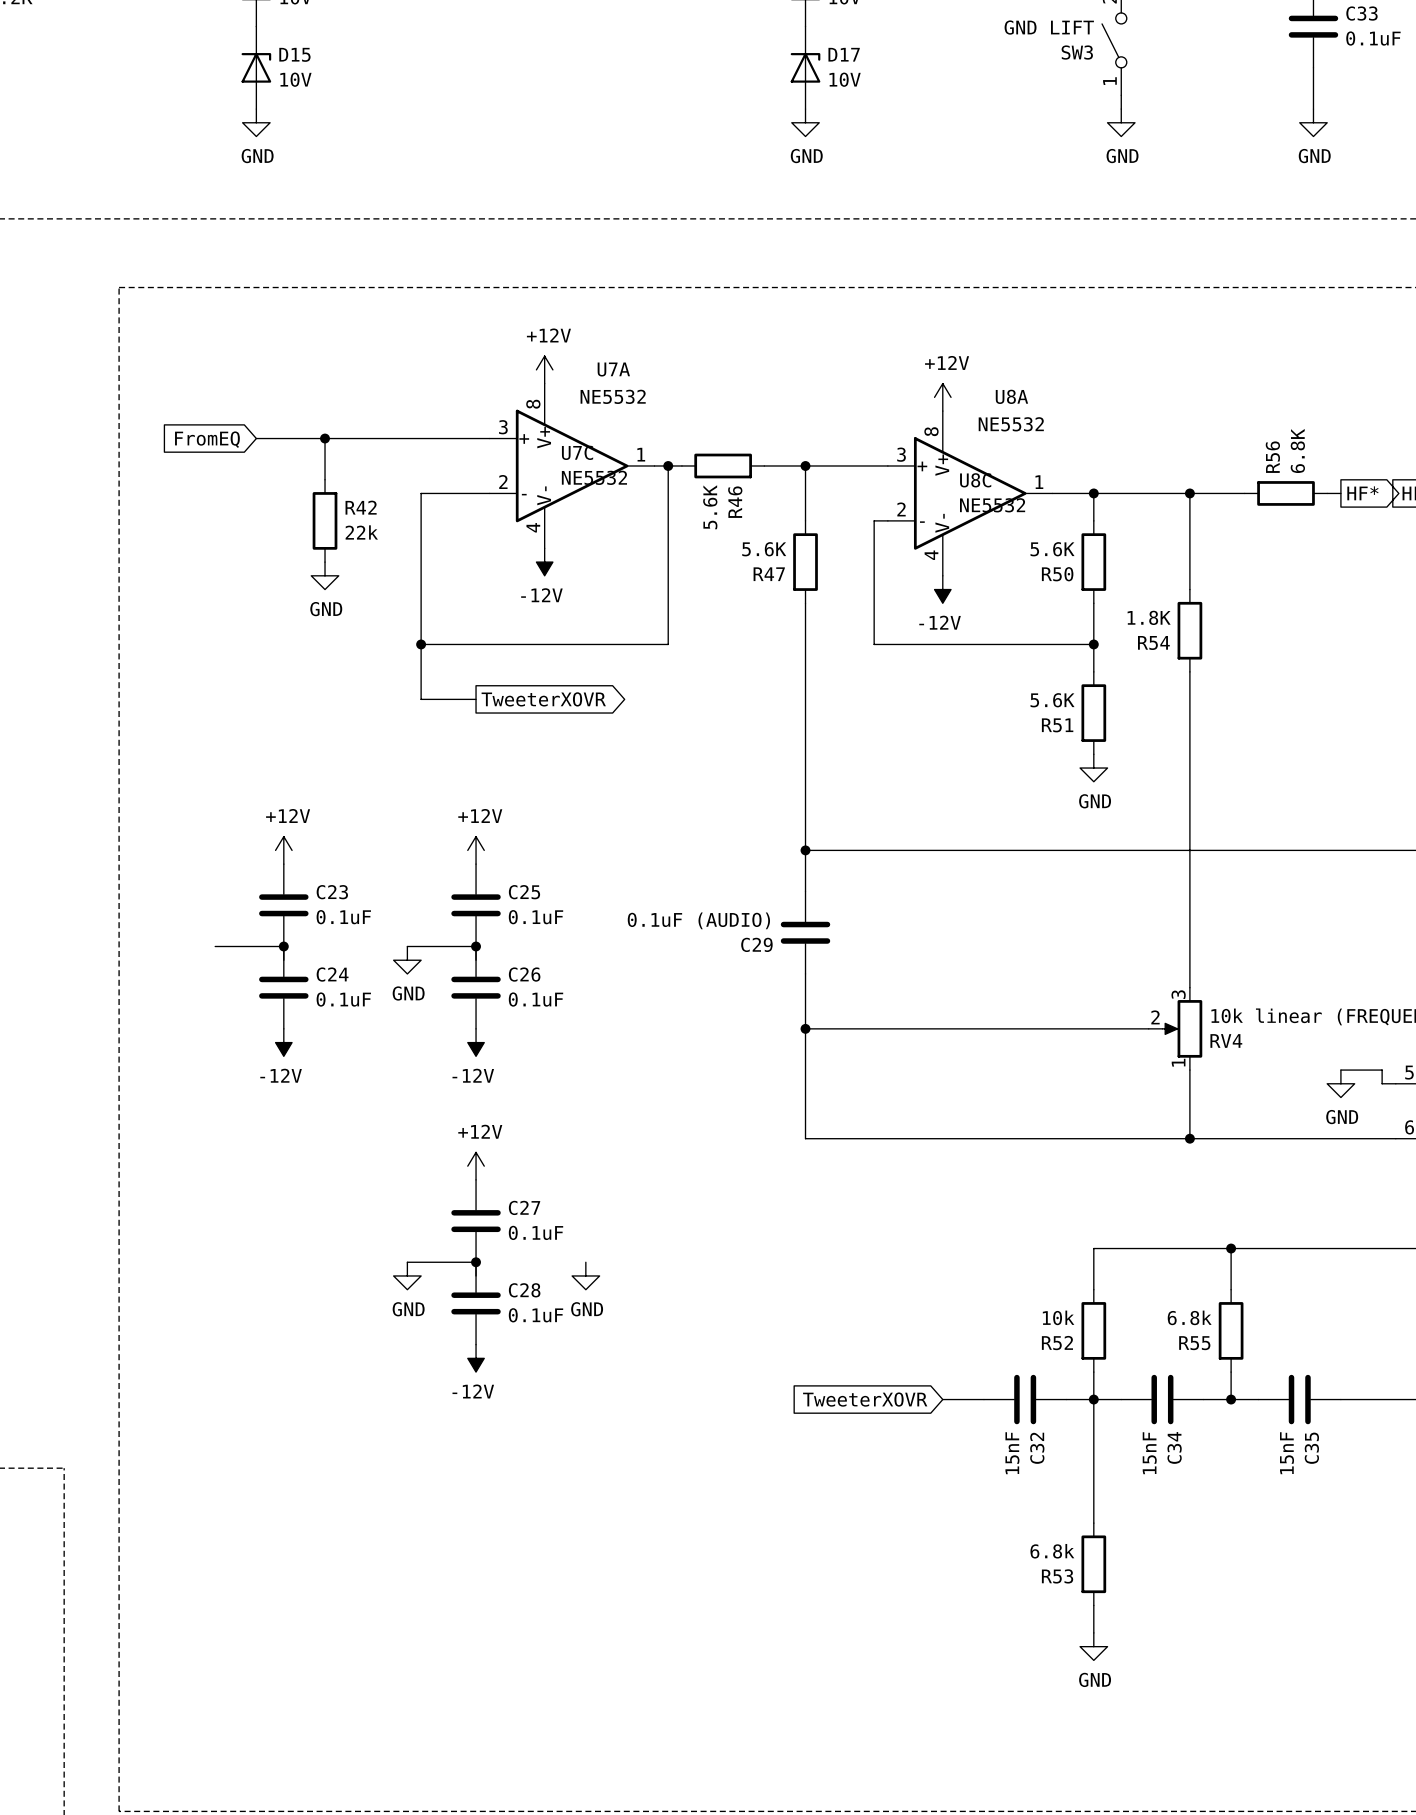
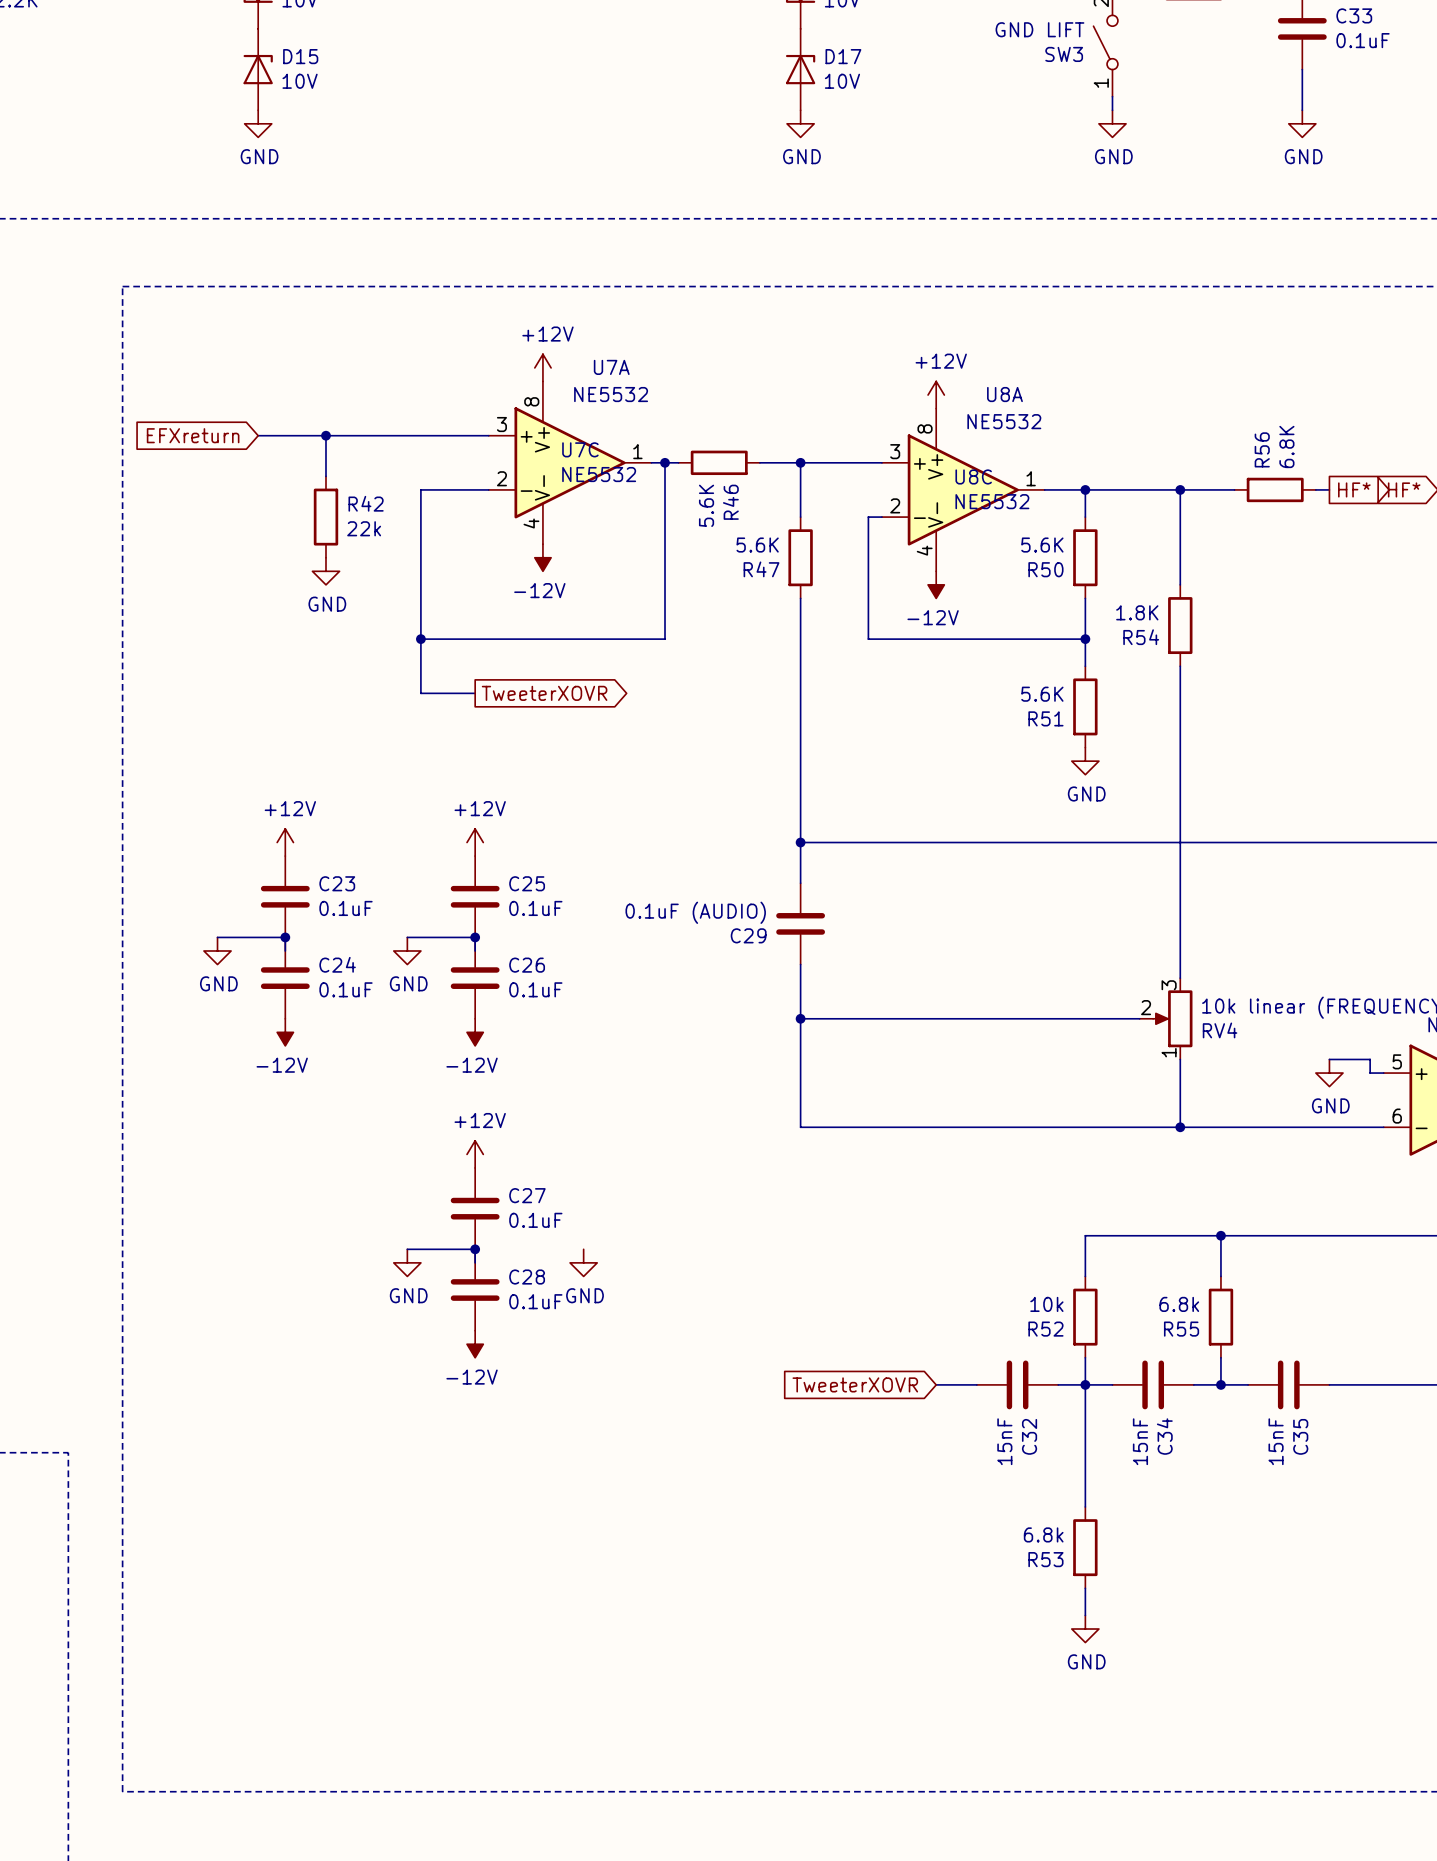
global label: FromEQ (207, 439) -> EFXreturn (193, 435)
power symbol: none -> GND (217, 951)

